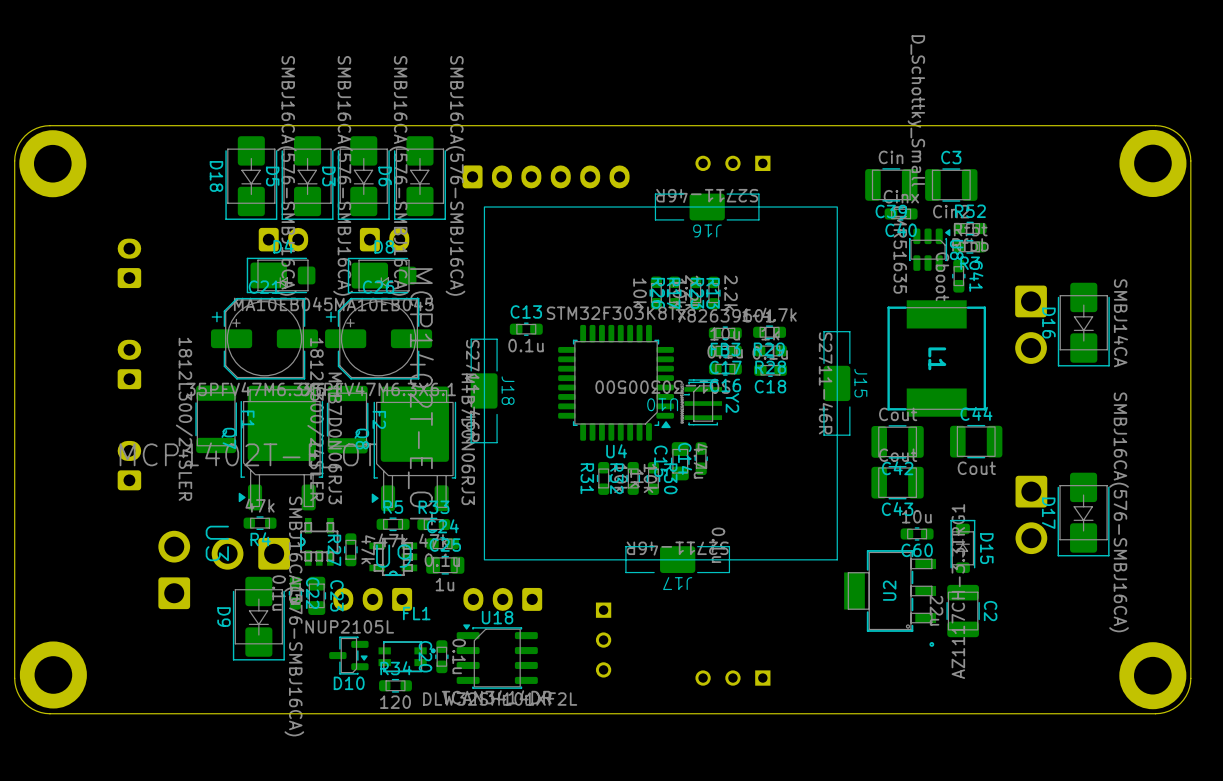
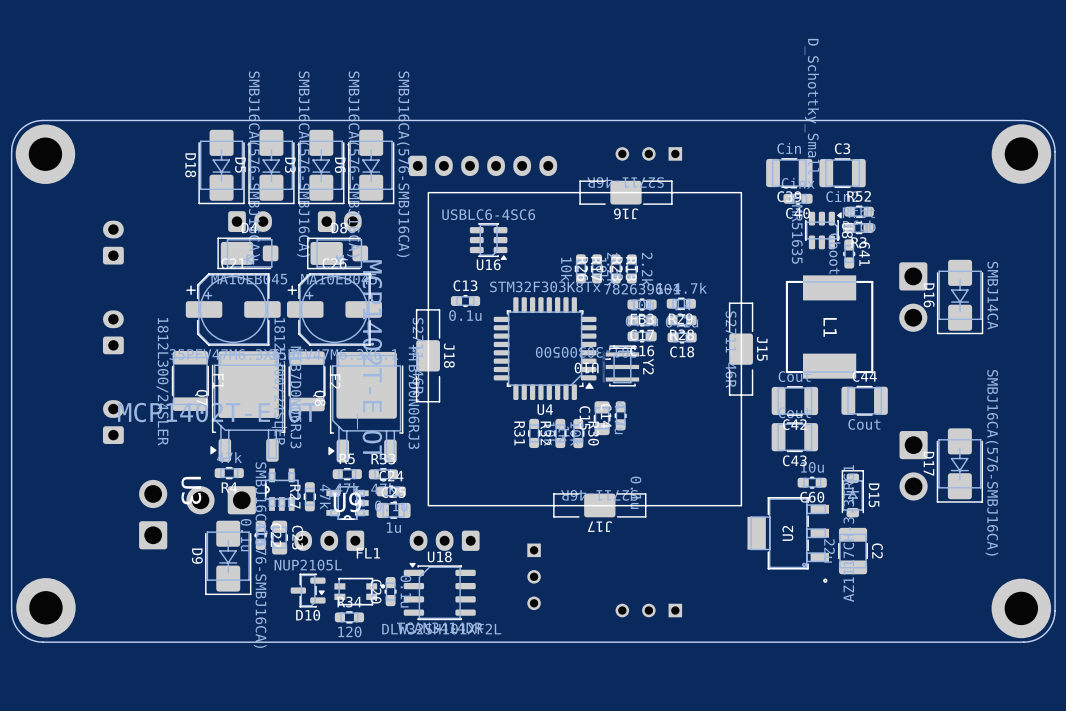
U16: none -> USBLC6-4SC6 (488, 241)

